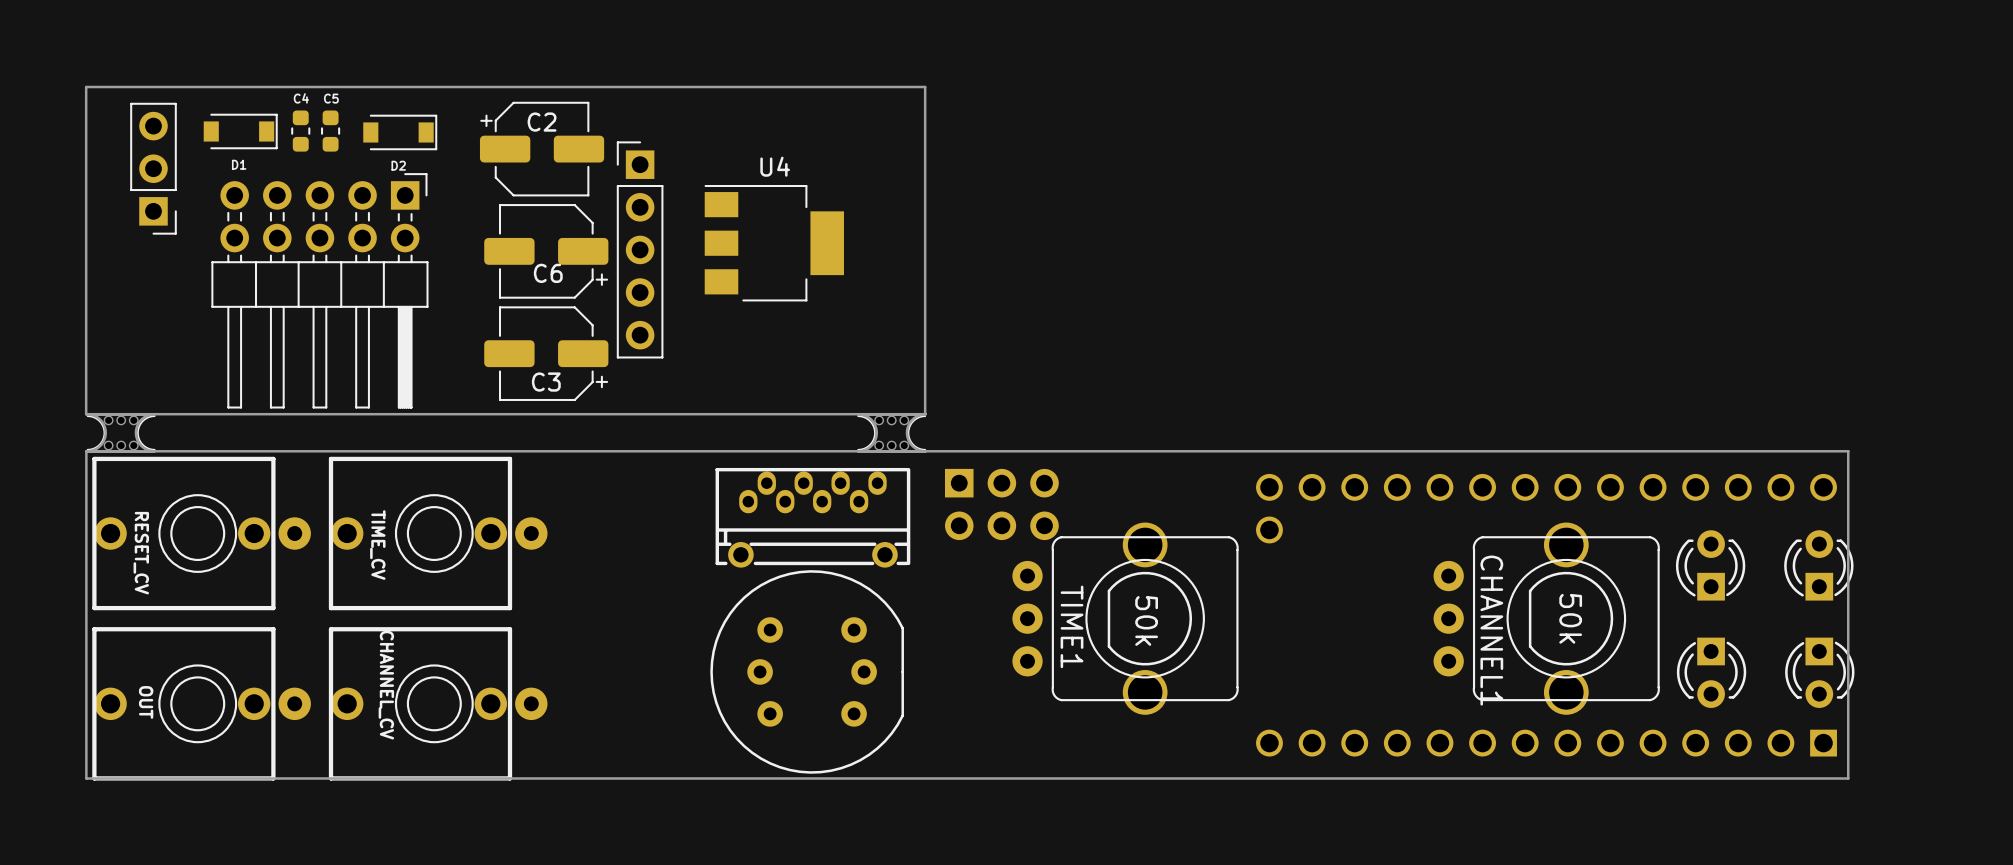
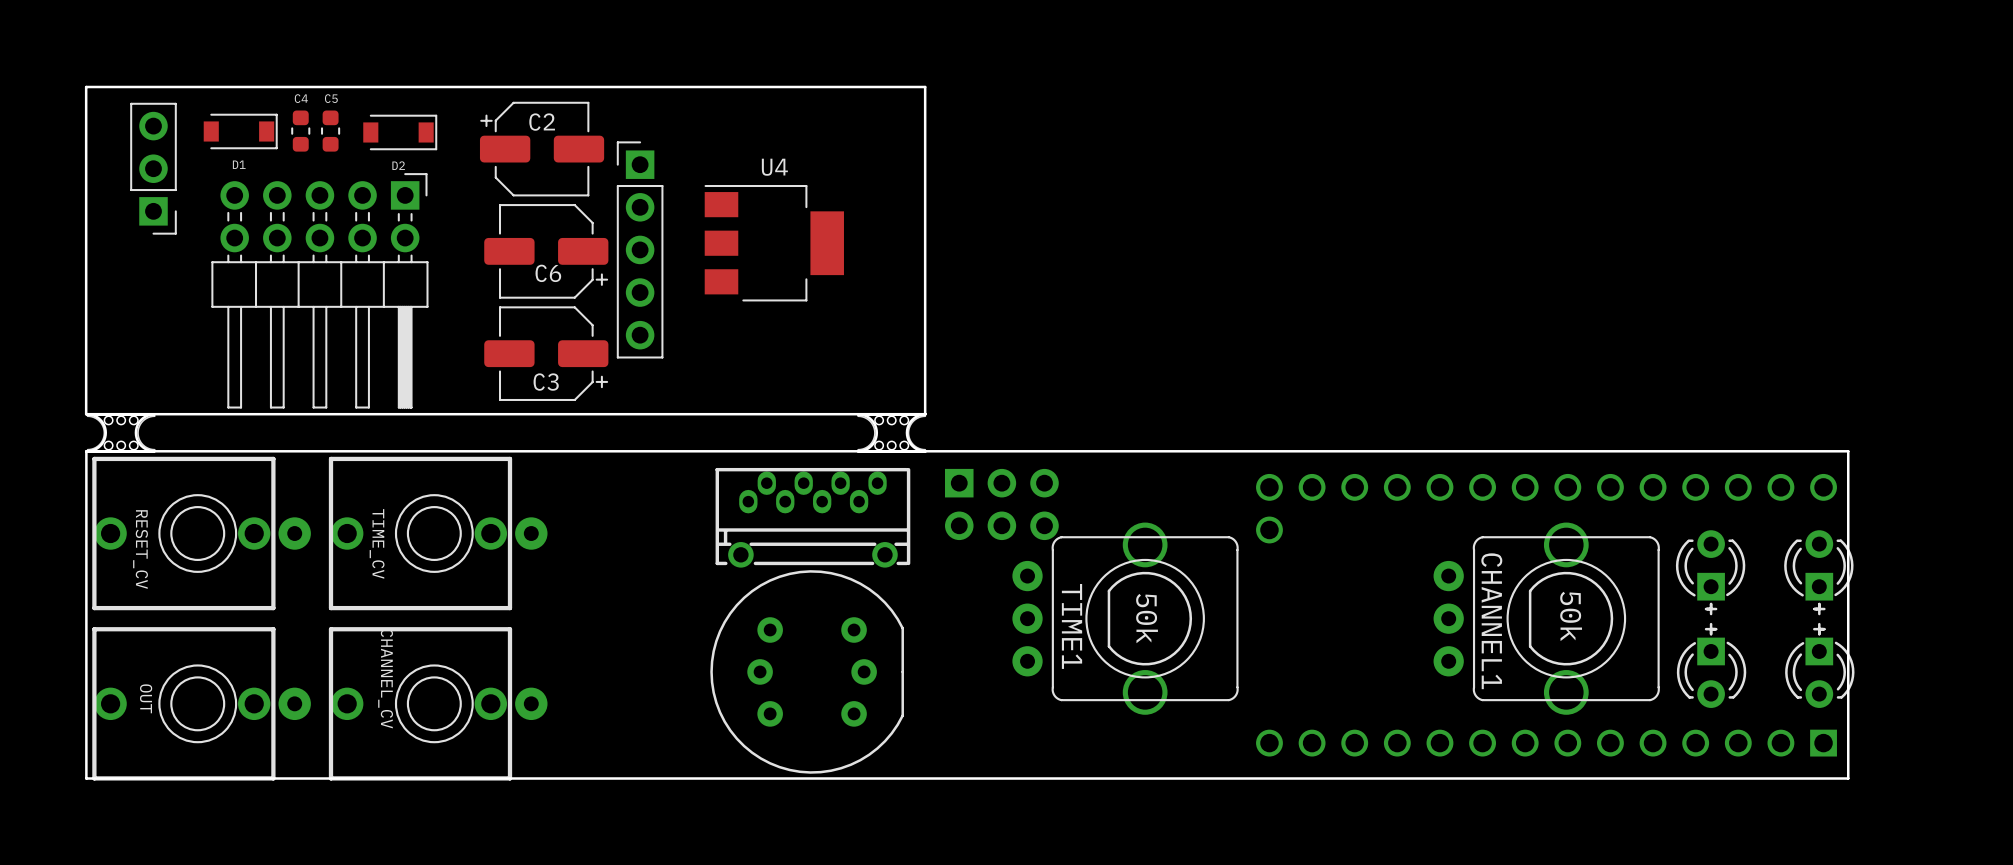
part footprint: [1675, 530, 1746, 601] -> [1675, 530, 1746, 616]
part footprint: [1784, 530, 1854, 601] -> [1784, 530, 1854, 616]
part footprint: [1676, 637, 1747, 708] -> [1676, 622, 1747, 708]
part footprint: [1785, 637, 1855, 708] -> [1785, 622, 1855, 708]

